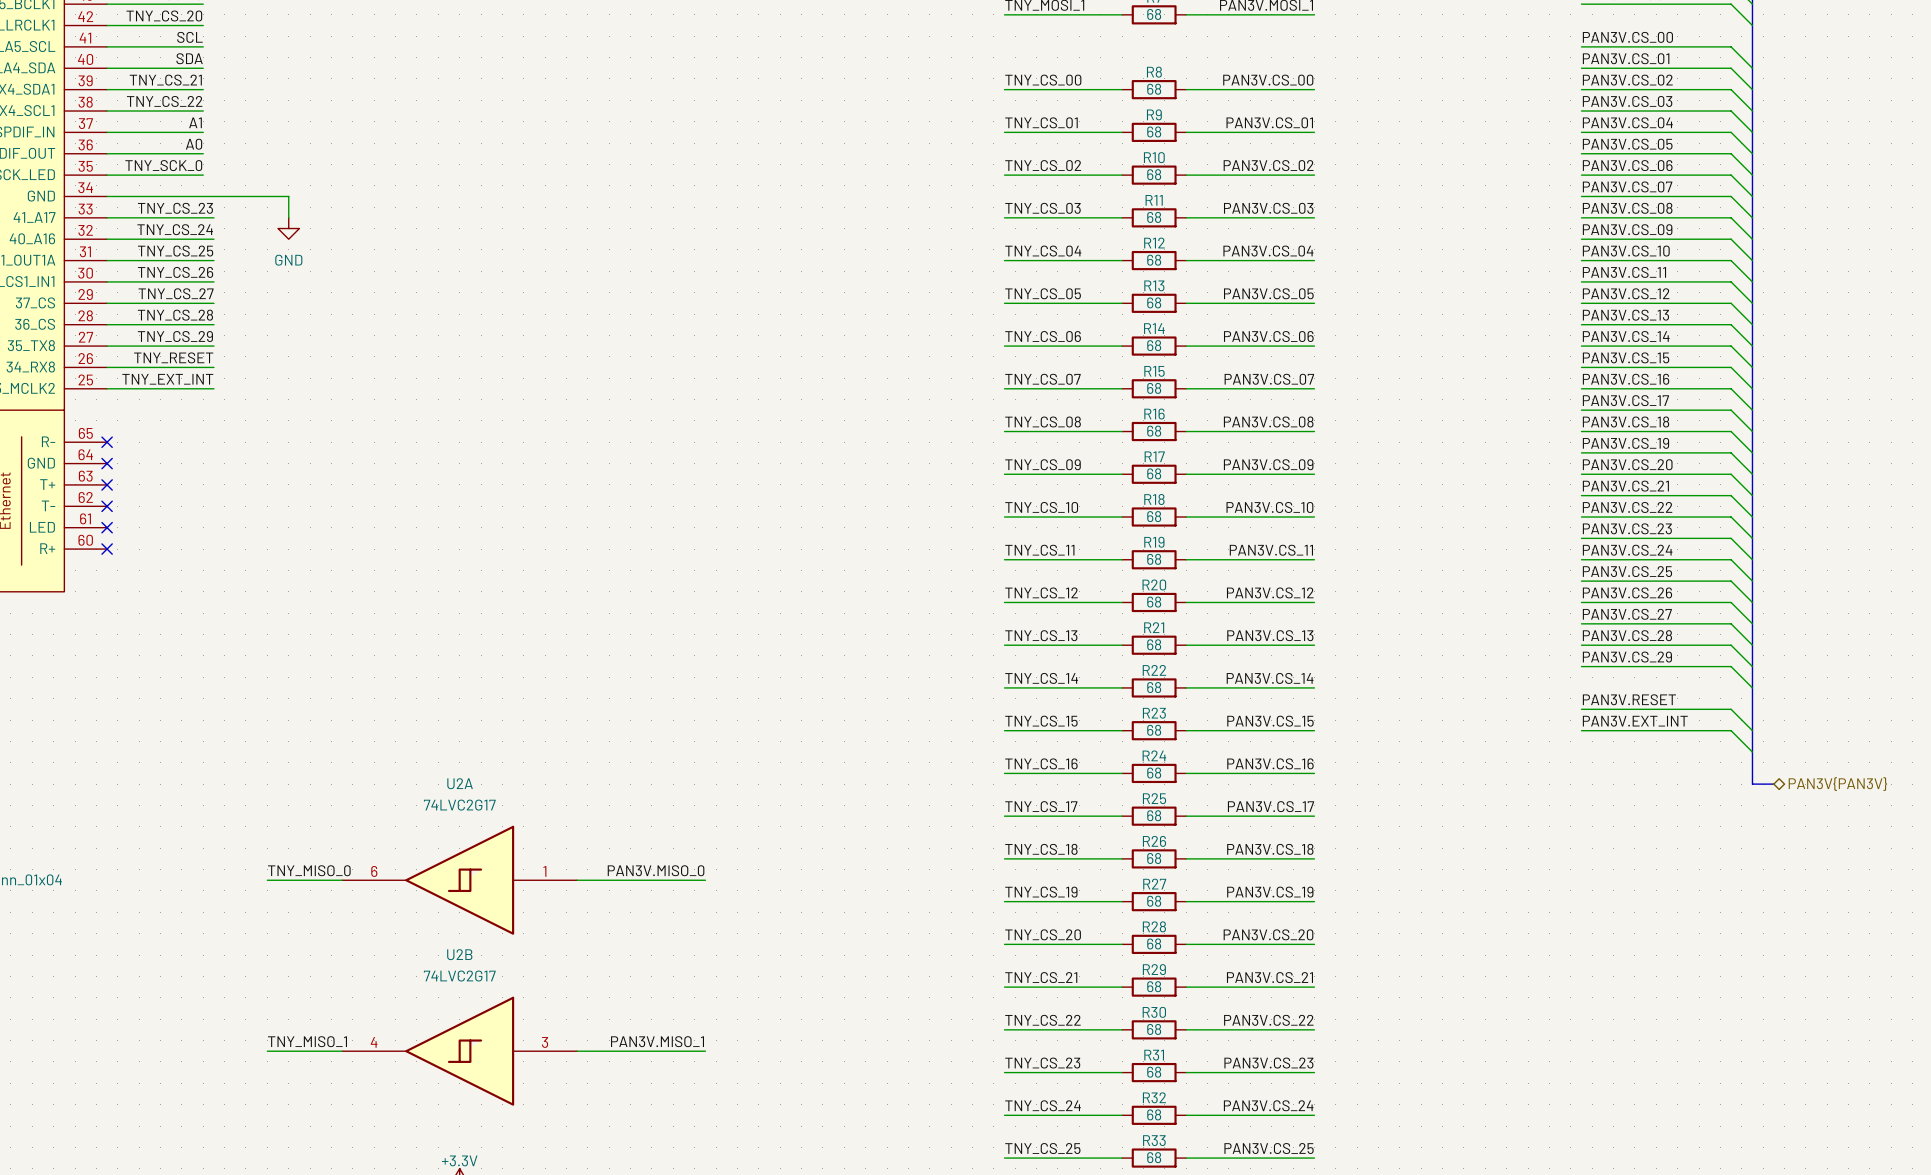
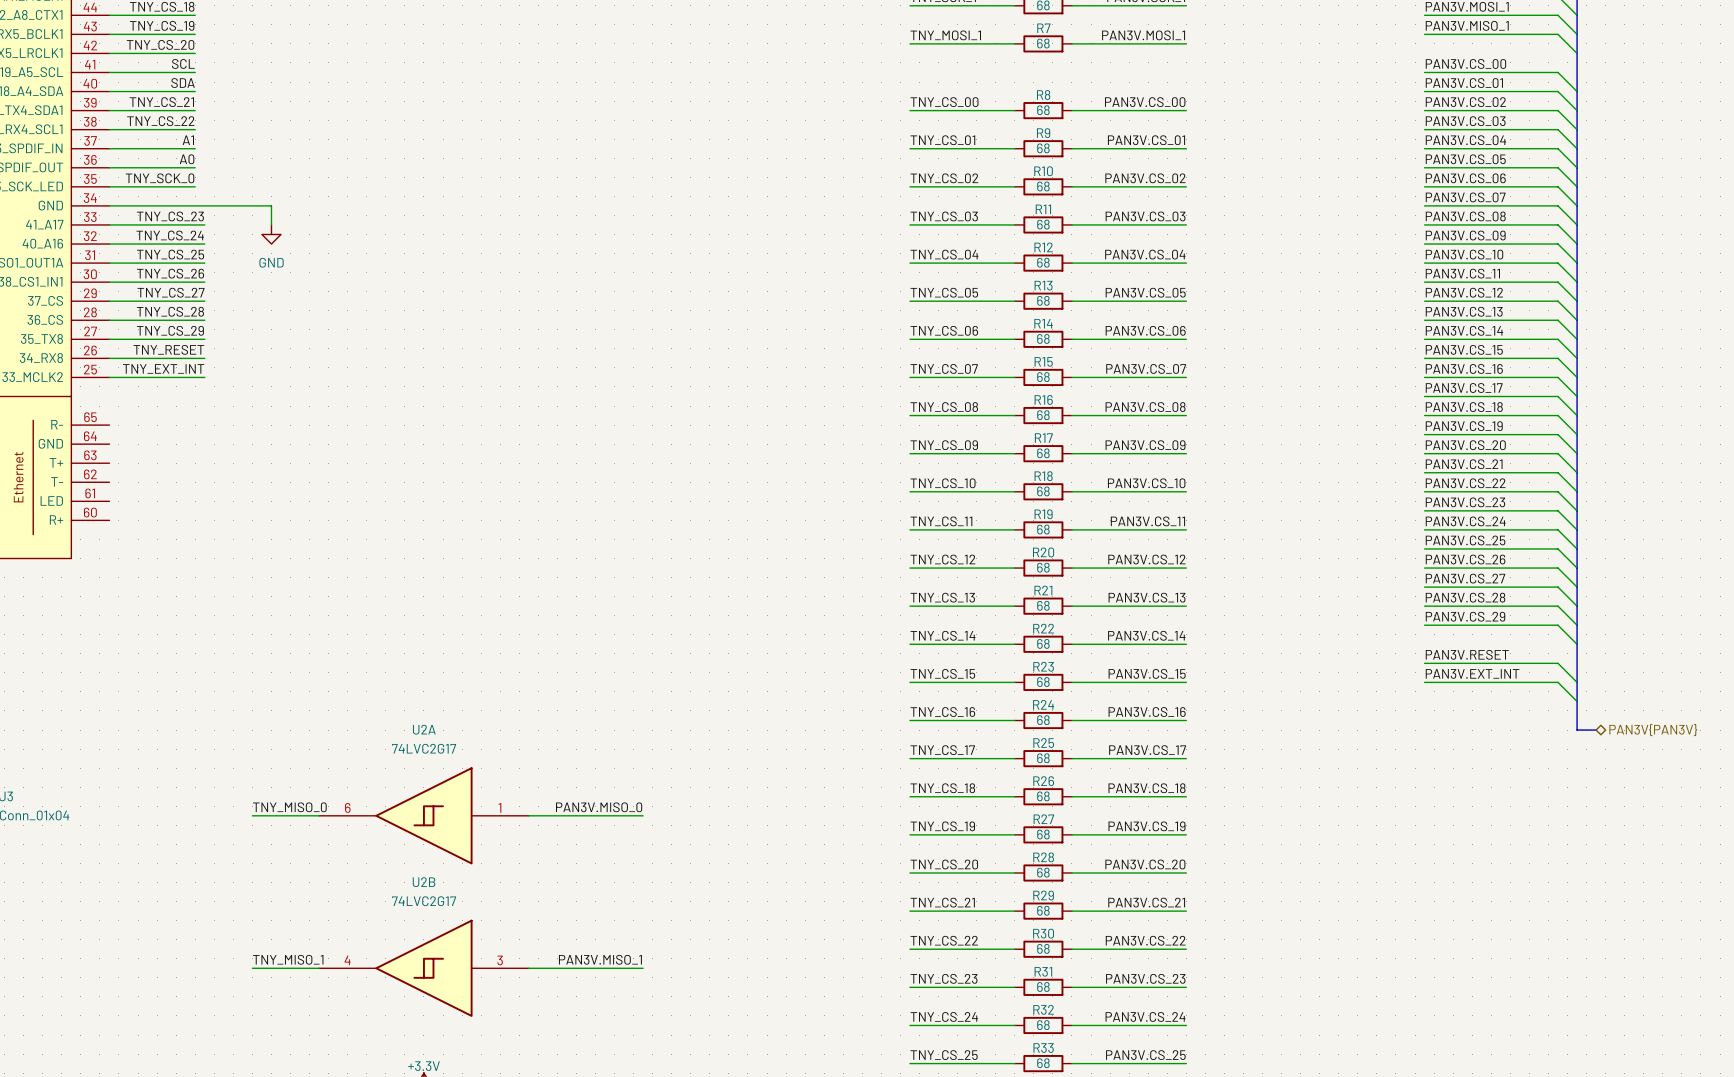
no-connect mark: (107, 442) -> none
no-connect mark: (107, 463) -> none
no-connect mark: (107, 484) -> none
no-connect mark: (107, 506) -> none
no-connect mark: (107, 527) -> none
no-connect mark: (107, 549) -> none

